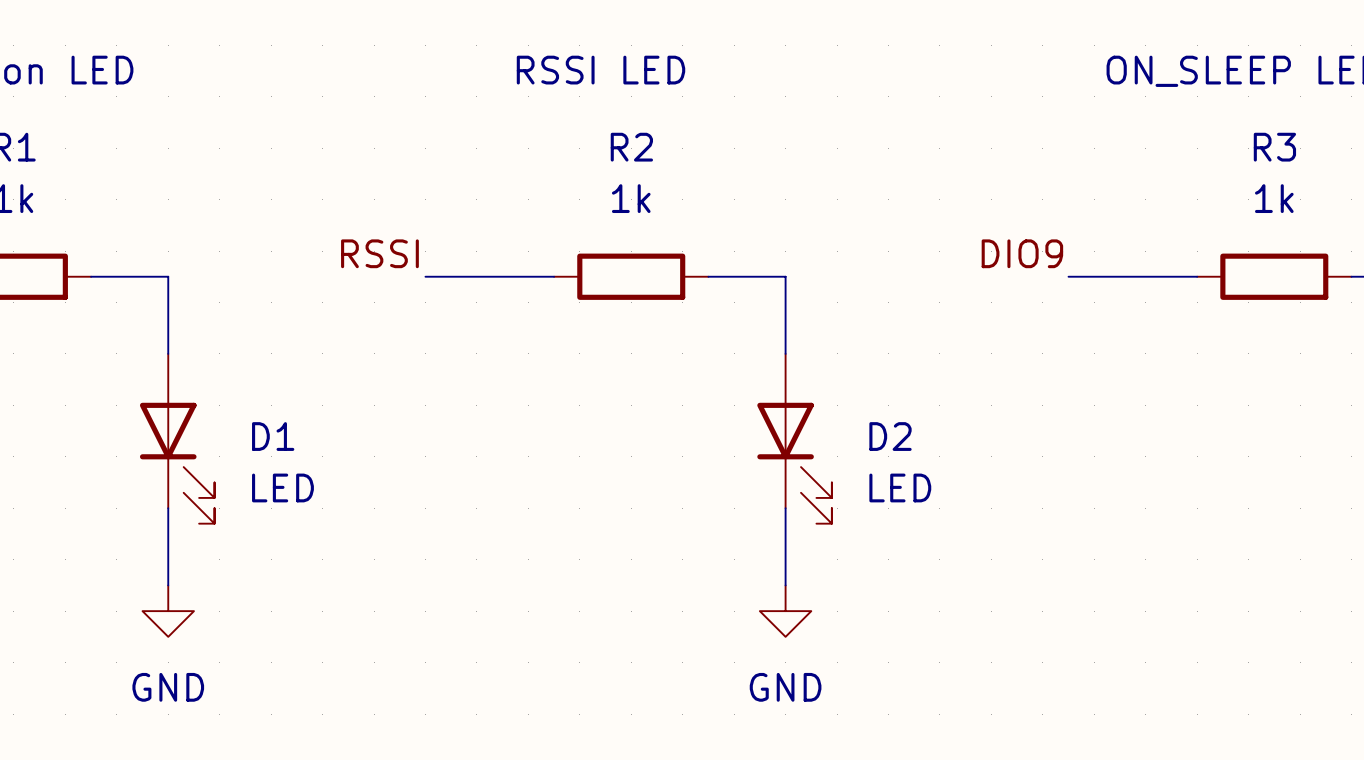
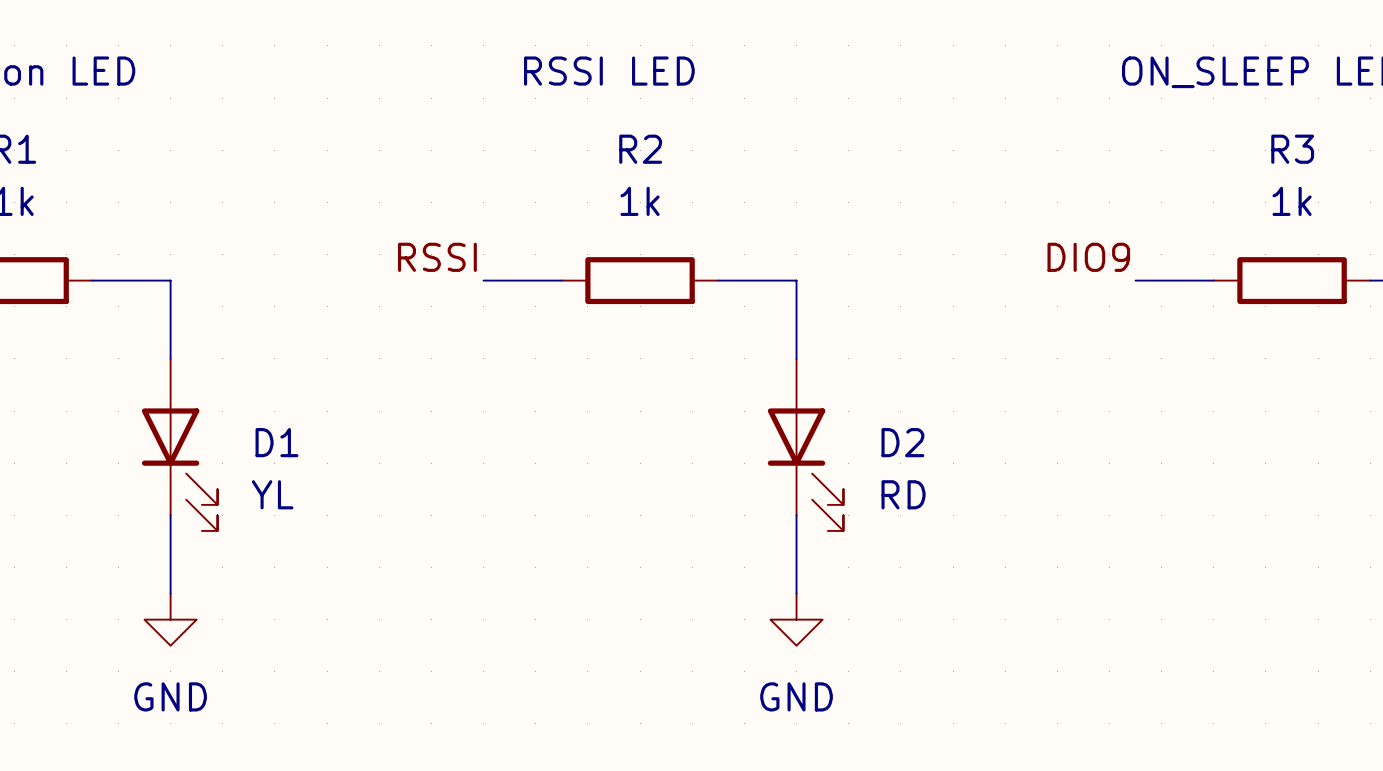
label position: RSSI (379, 253) -> RSSI (437, 257)
label position: DIO9 (1022, 253) -> DIO9 (1088, 257)
wire: (425, 276) (476, 276) -> none
wire: (1068, 276) (1119, 276) -> none
D1 value: LED (282, 487) -> YL (272, 494)
D2 value: LED (900, 487) -> RD (903, 494)

